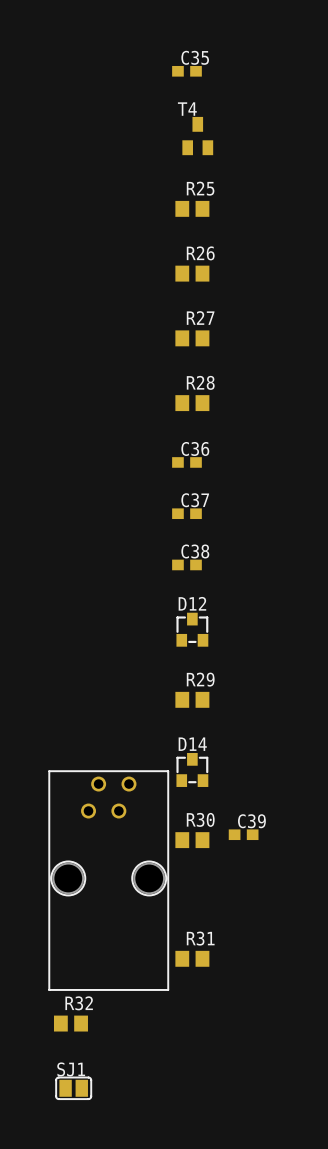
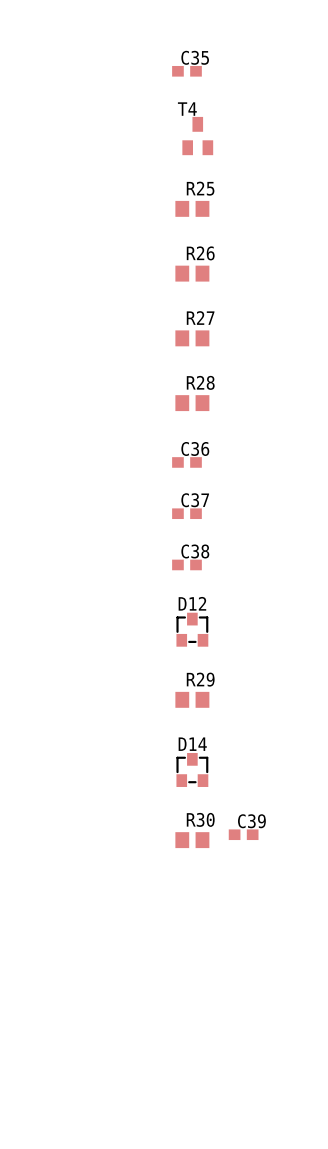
part: (108, 880) -> none
R31: (192, 958) -> none
R32: (70, 1023) -> none
SJ1: (73, 1088) -> none

